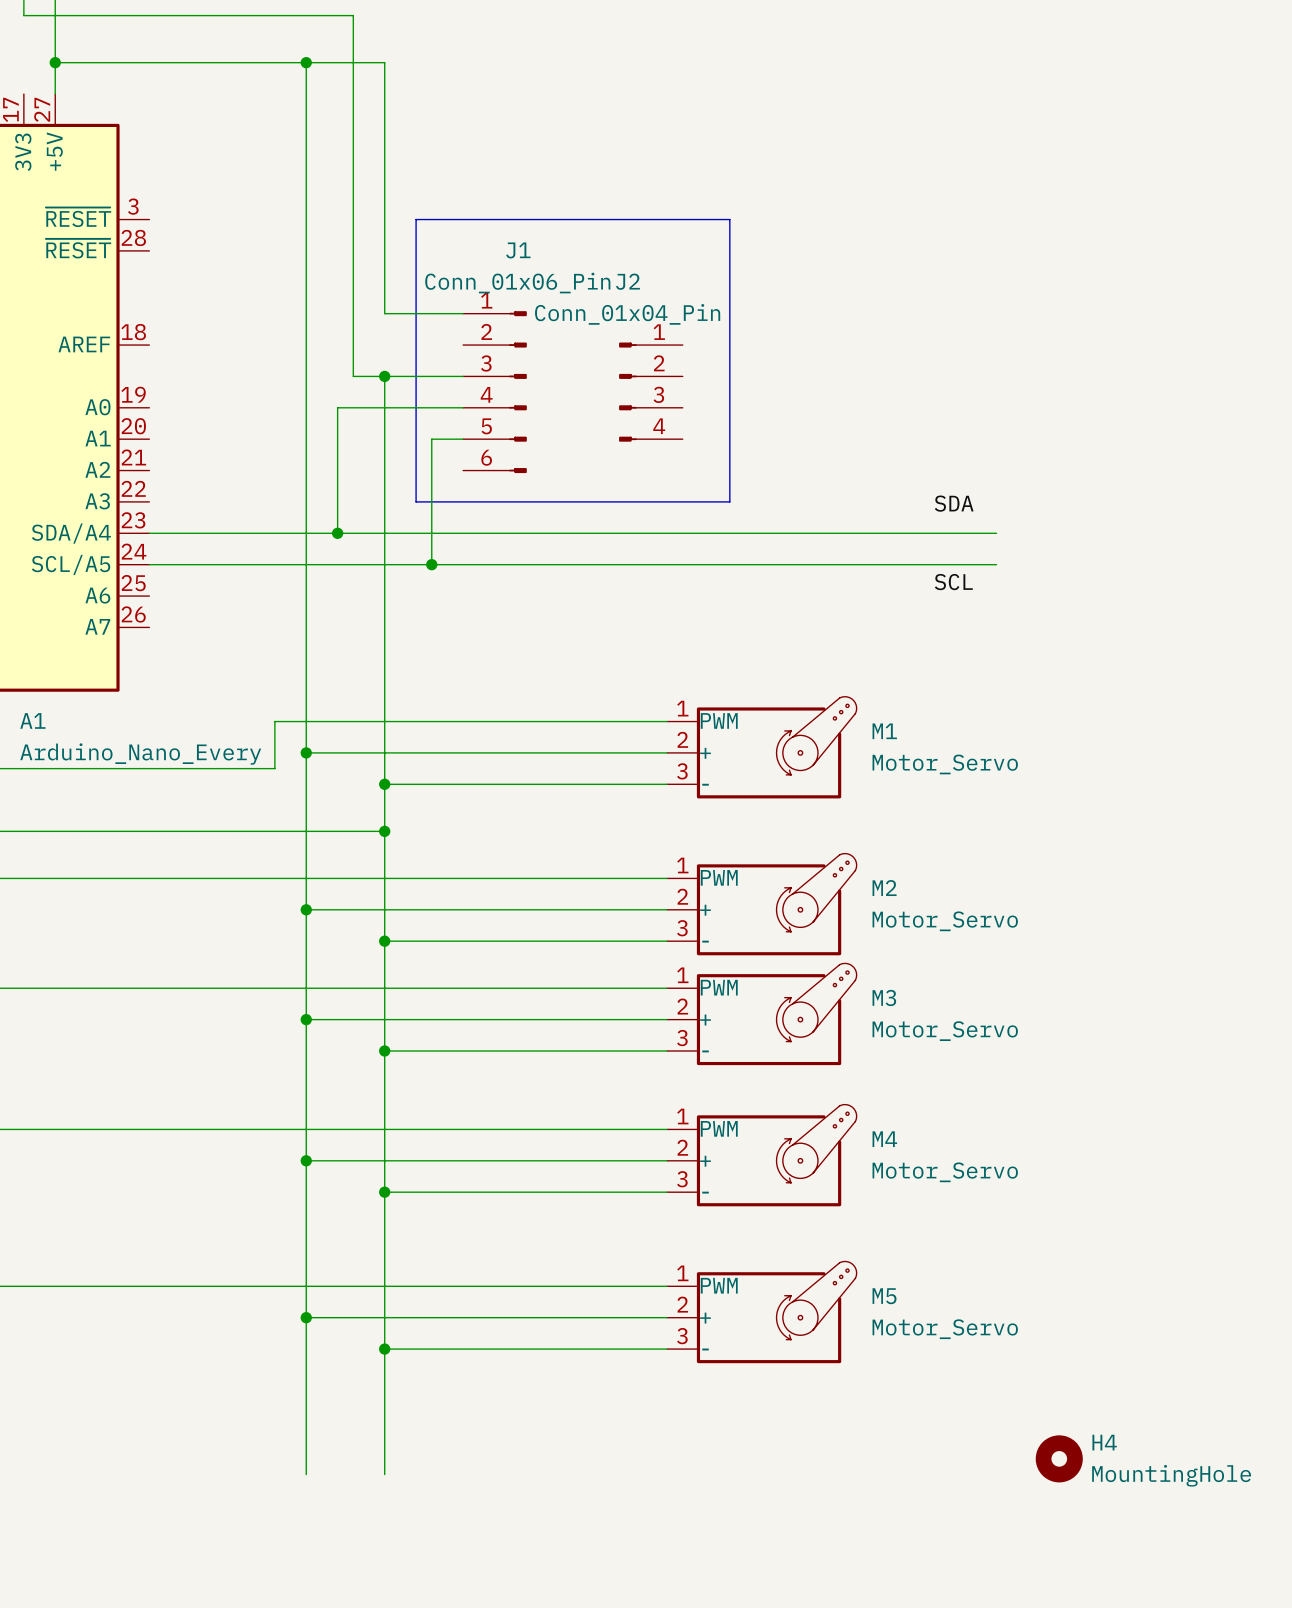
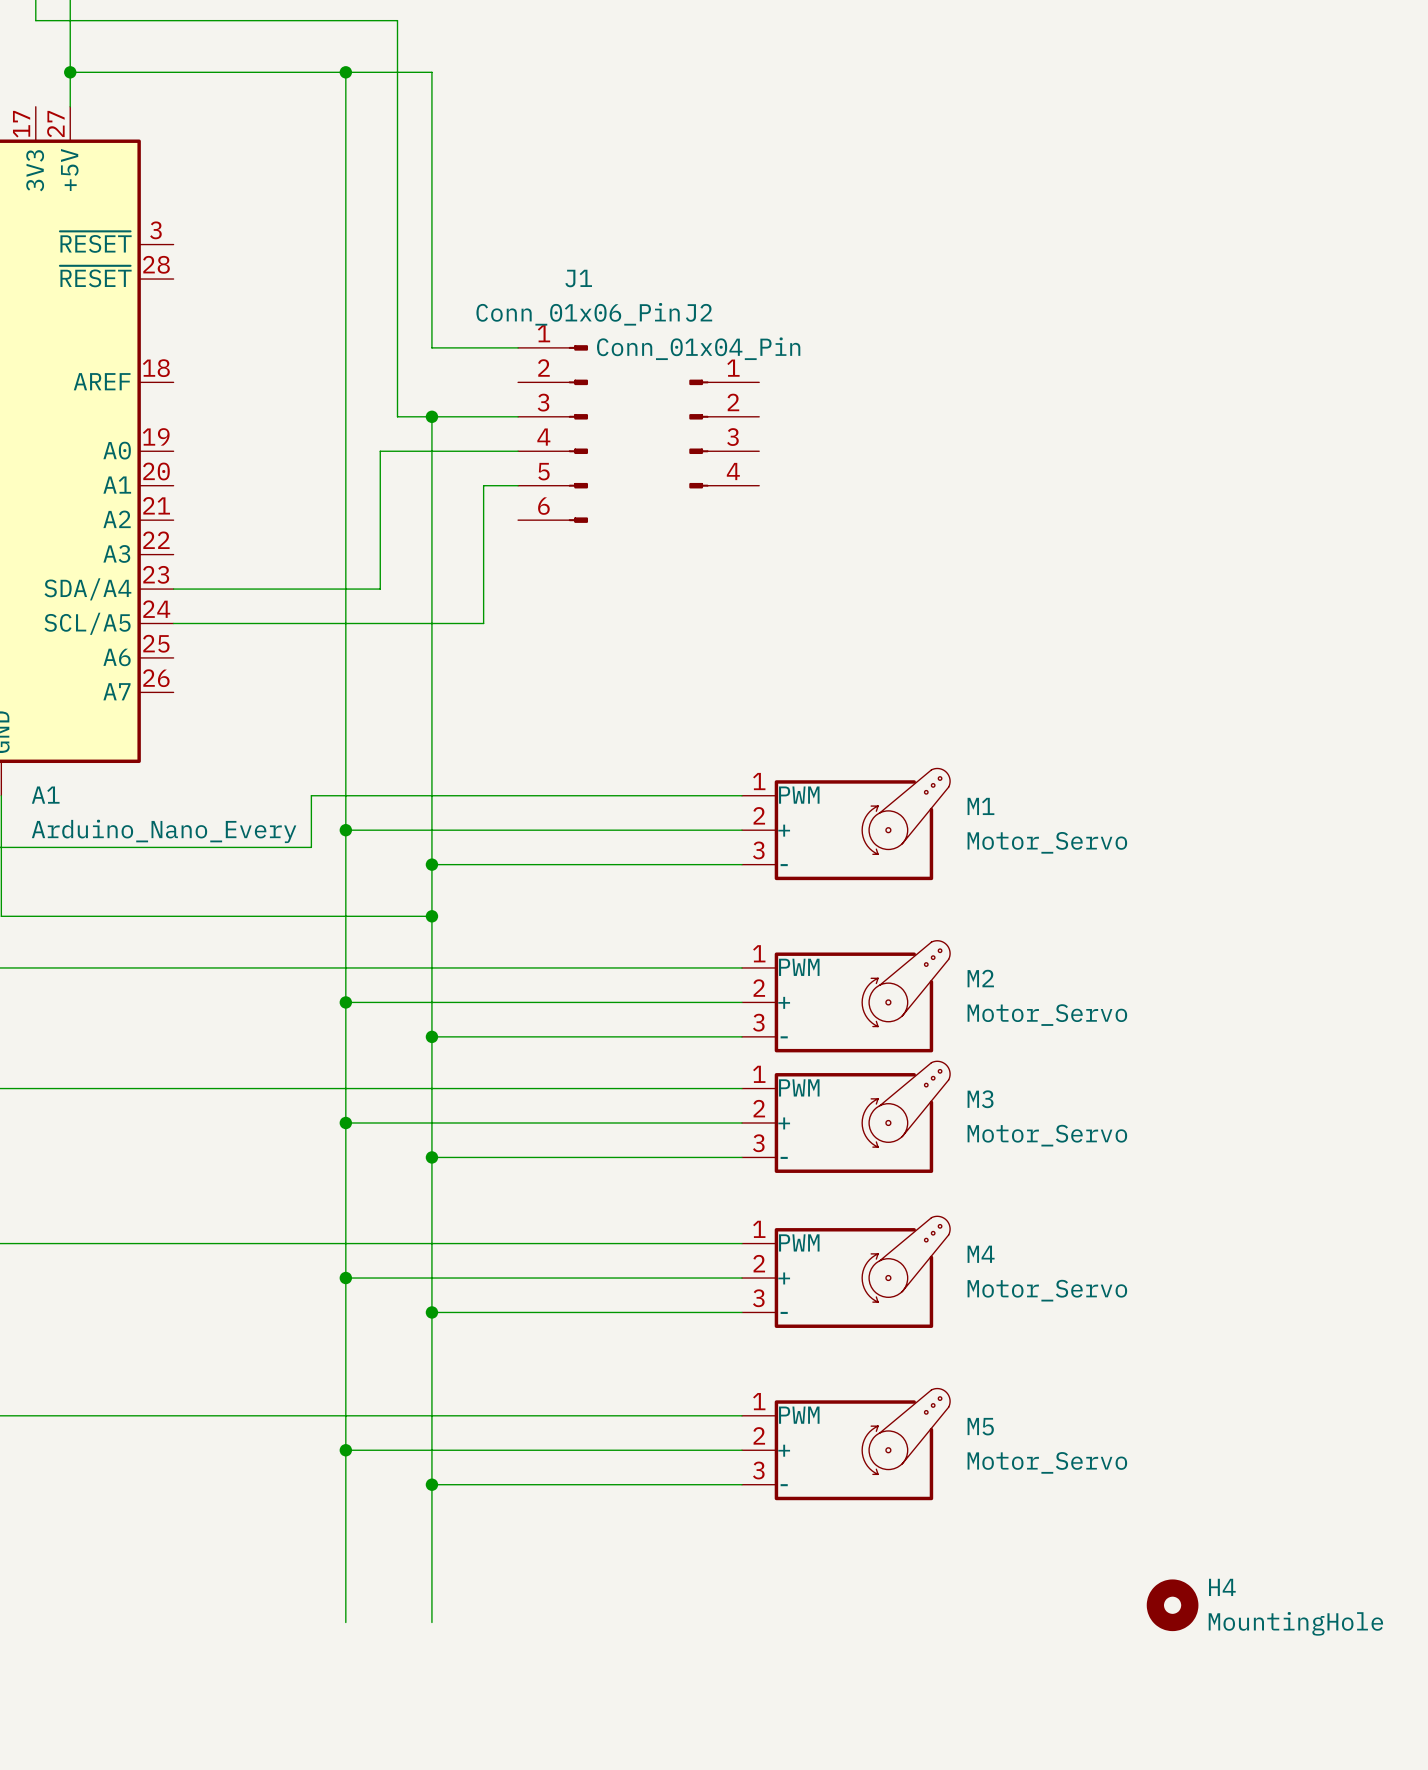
line: (416, 219) (729, 219) (729, 501) (416, 501) (416, 219) -> none
label: SDA (954, 503) -> none
wire: (337, 533) (996, 533) -> none
junction: (337, 533) -> none
wire: (431, 564) (996, 564) -> none
junction: (431, 564) -> none
label: SCL (953, 582) -> none

